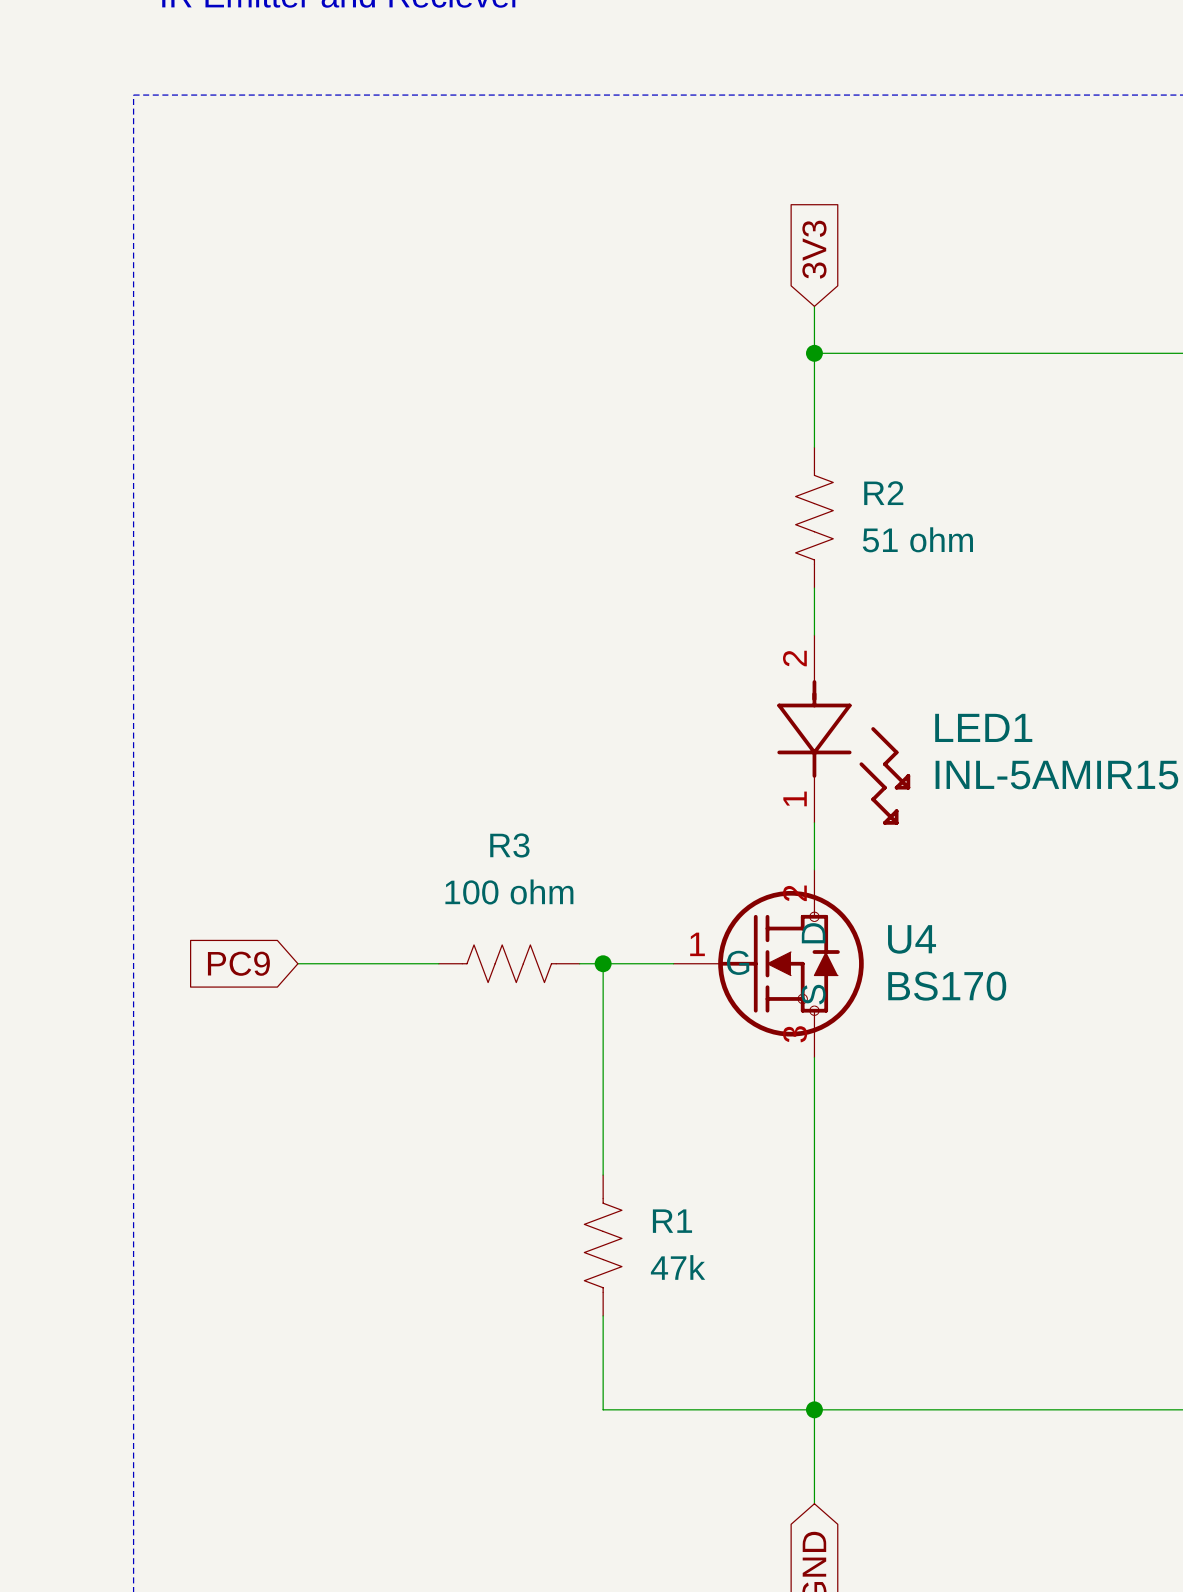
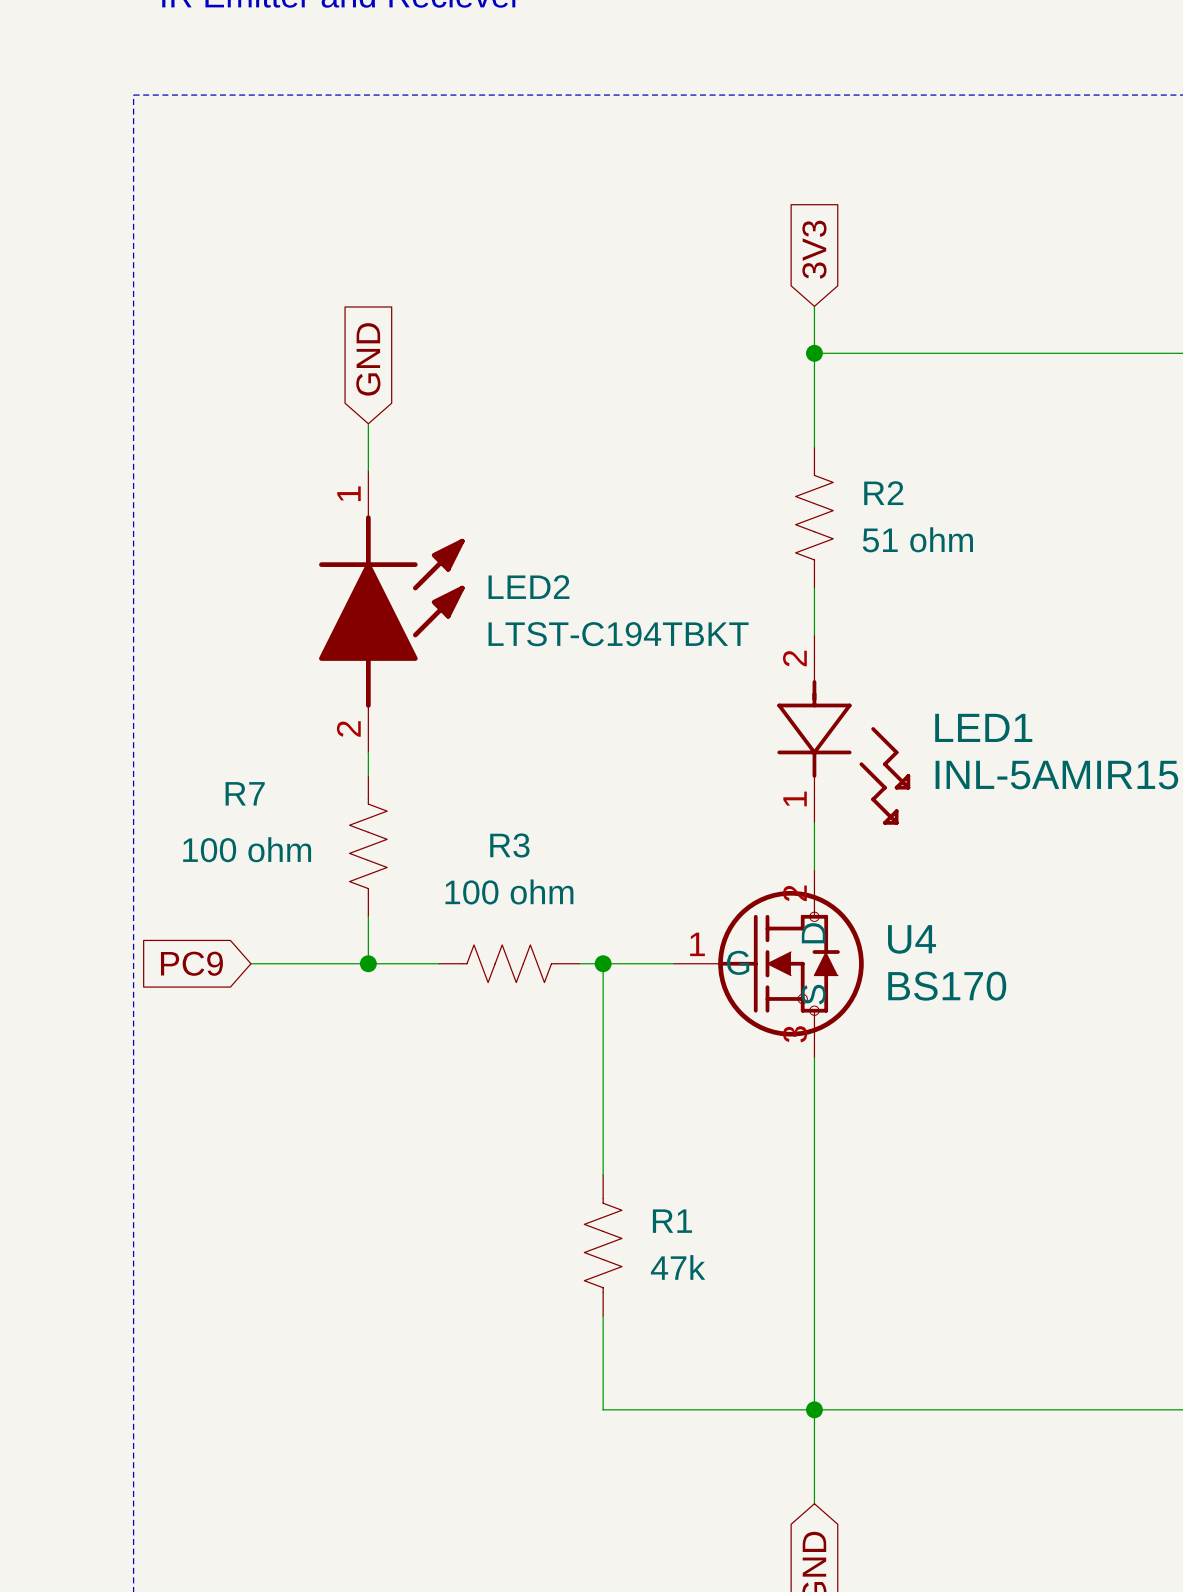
global label: none -> GND (368, 359)
wire: none -> (368, 423) (368, 470)
LED2: none -> LTST-C194TBKT (391, 611)
wire: none -> (368, 752) (368, 775)
R7: none -> 100 ohm (368, 846)
wire: none -> (368, 916) (368, 963)
global label position: PC9 (238, 963) -> PC9 (191, 963)
wire: none -> (250, 963) (297, 963)
junction: none -> (368, 963)

